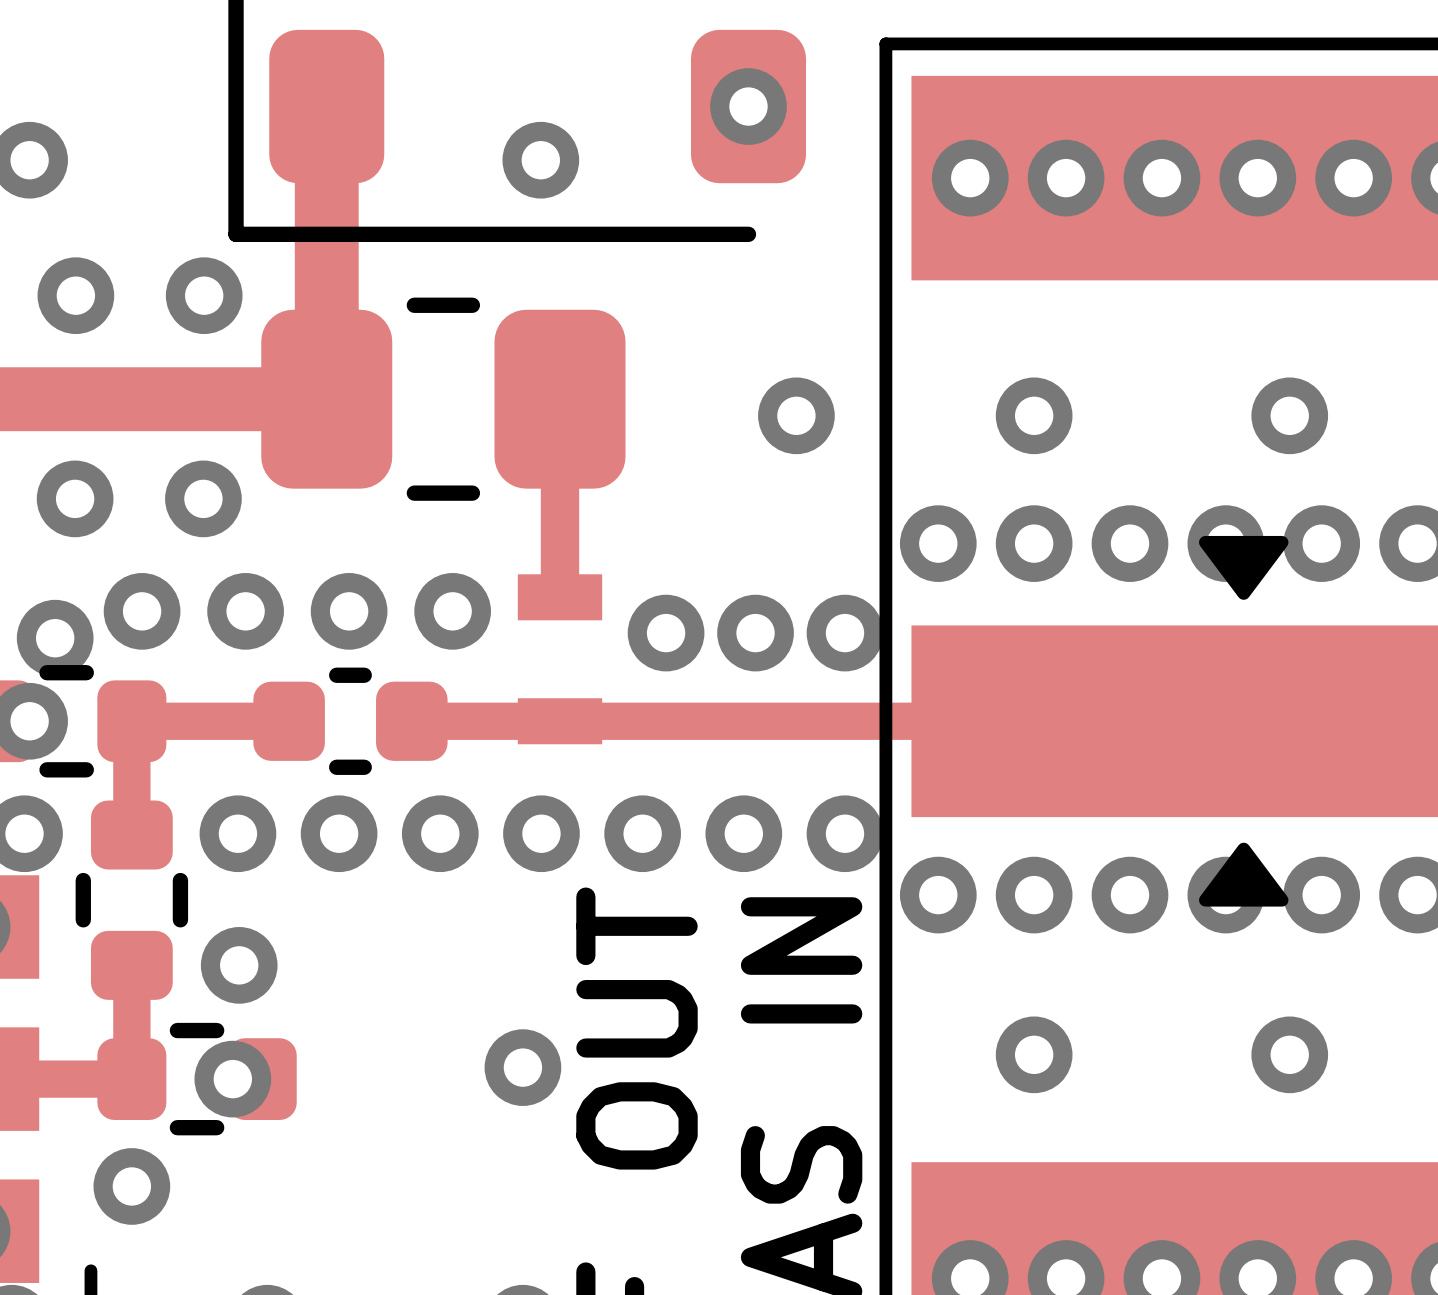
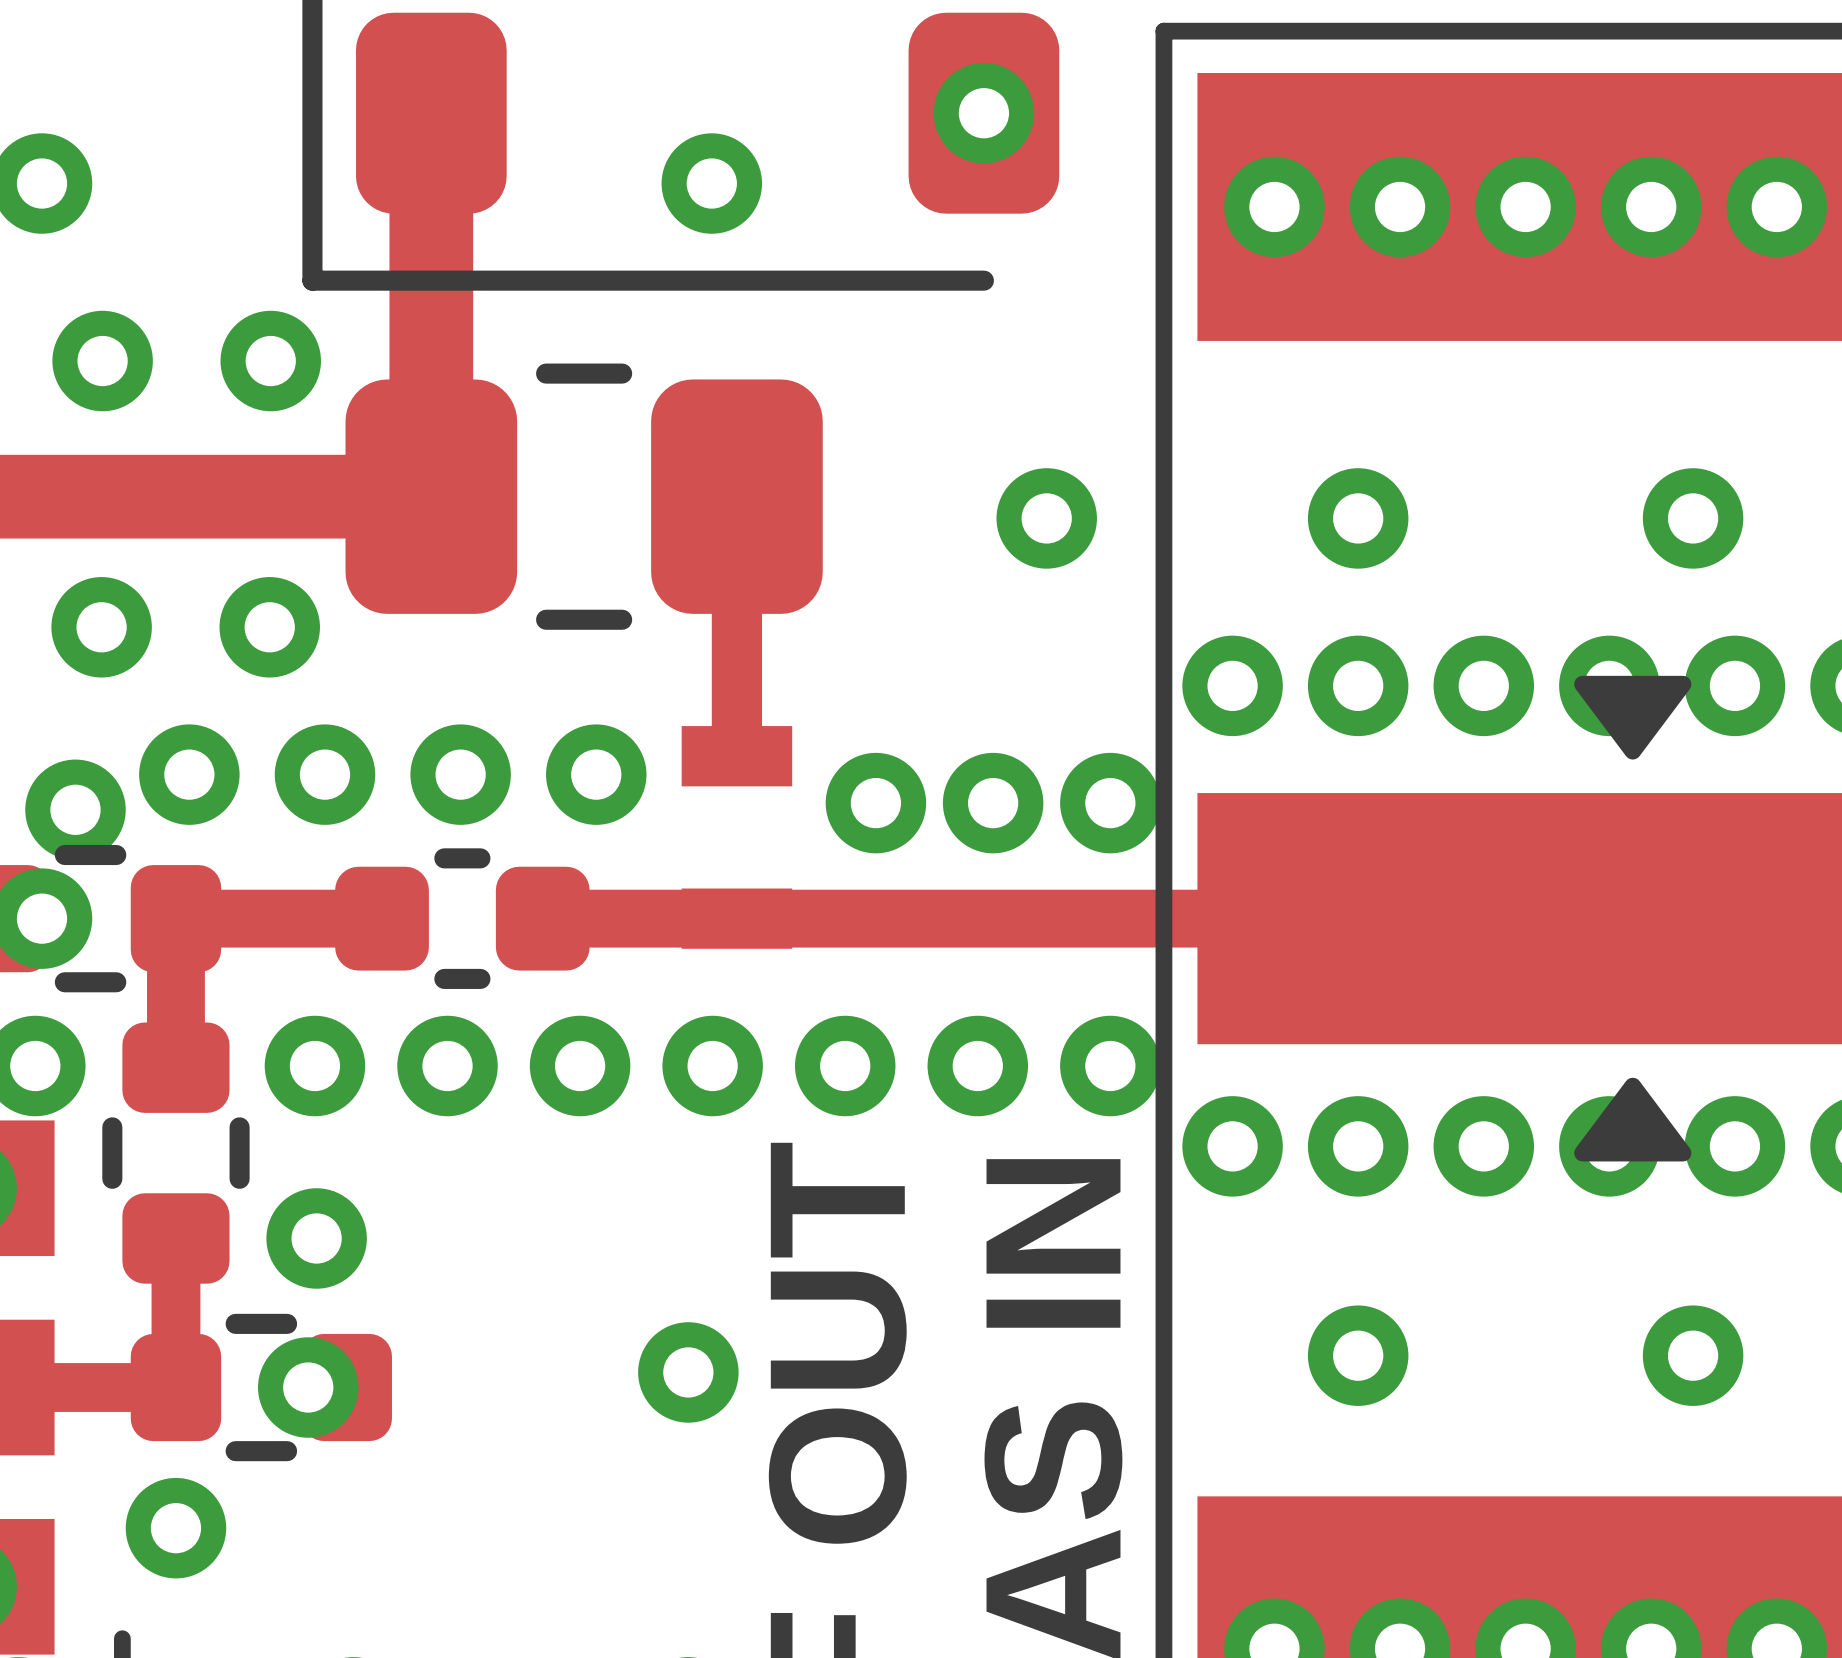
track width: thin (289, 721) (131, 721) (131, 835) -> thick (382, 918) (175, 918) (175, 1067)
track width: thin (411, 721) (1261, 721) -> thick (542, 918) (1656, 918)

